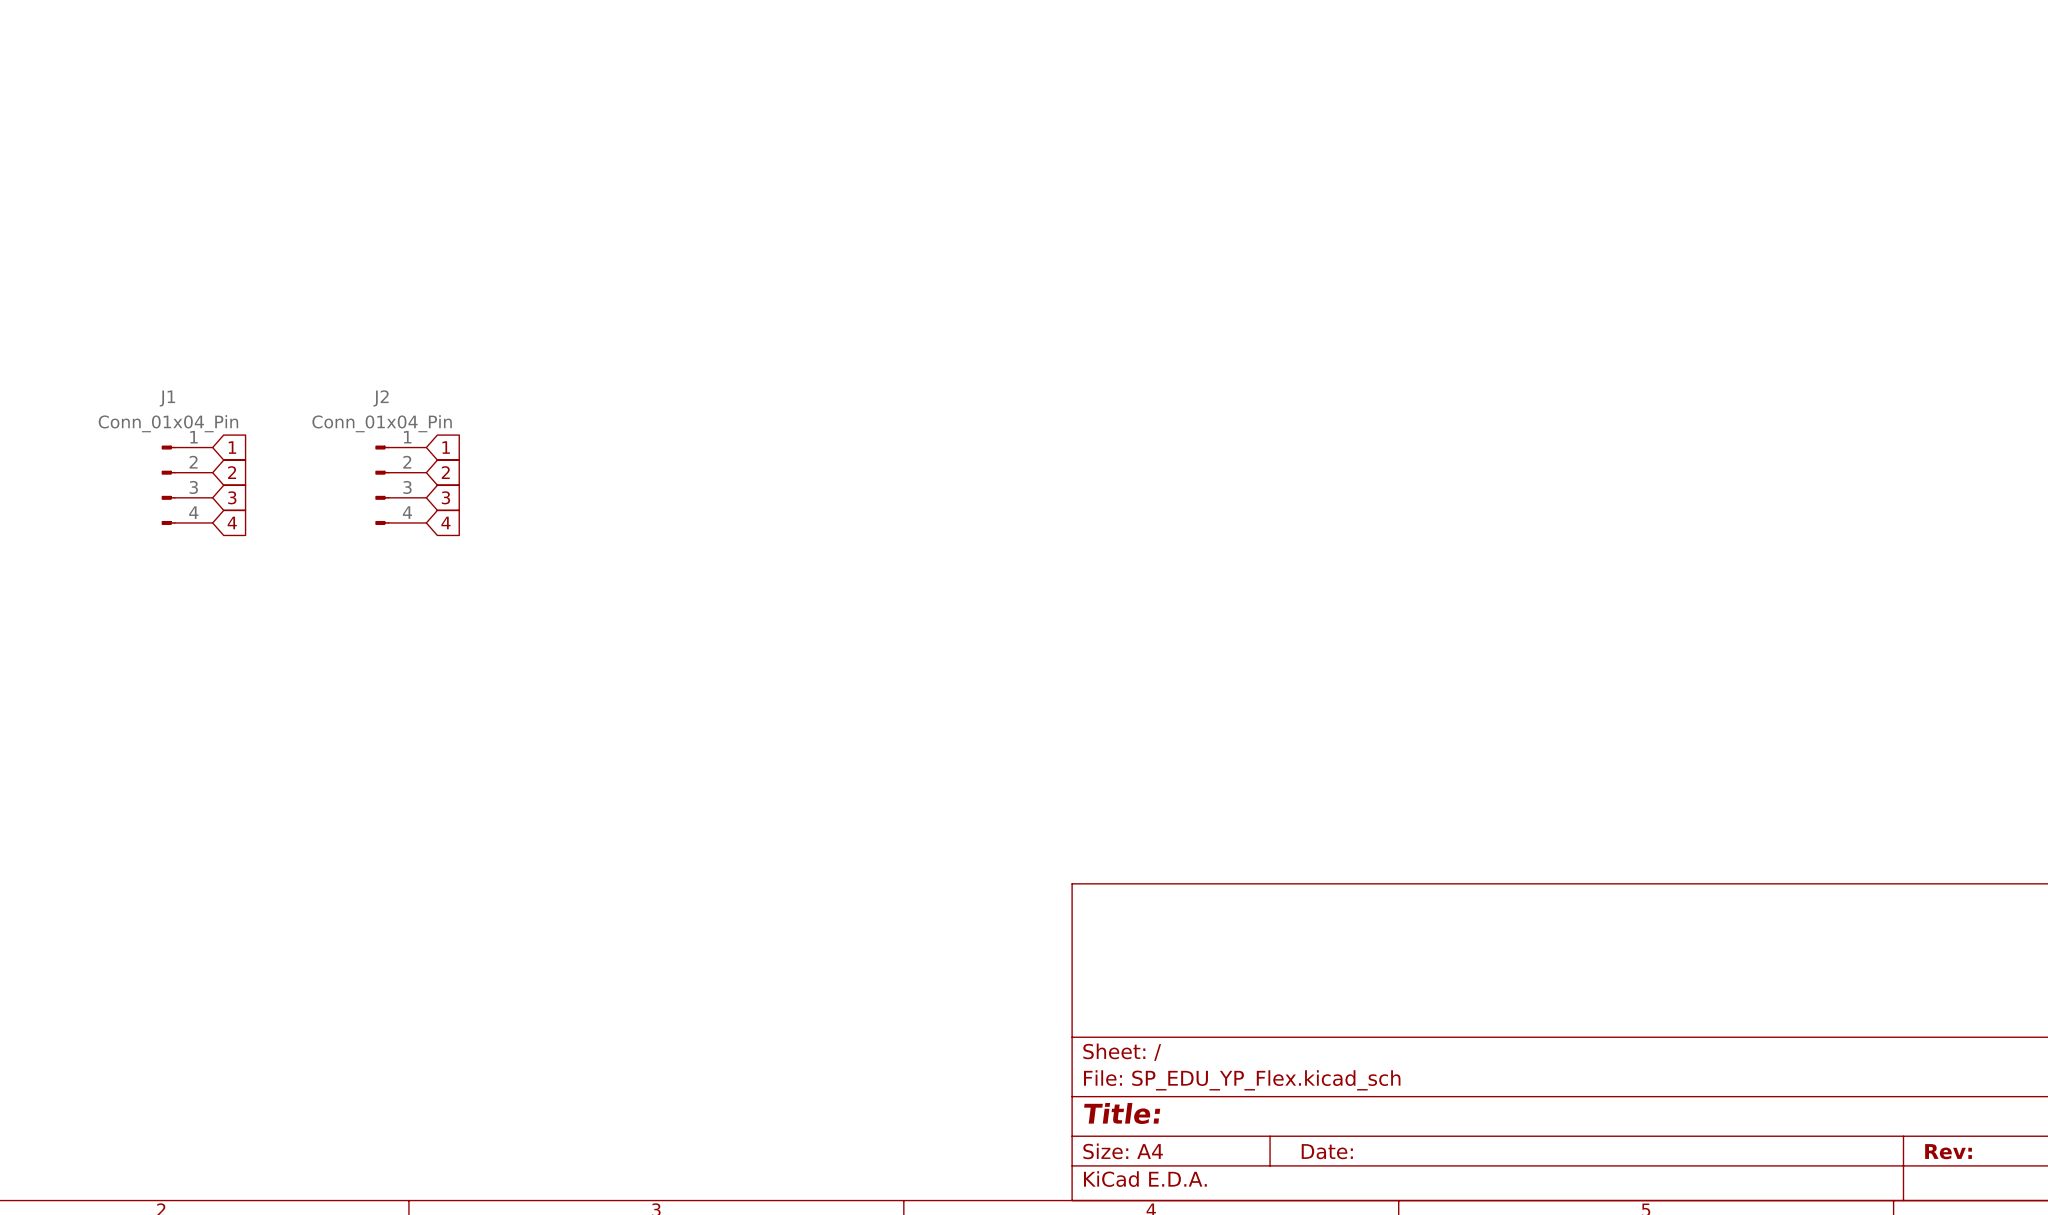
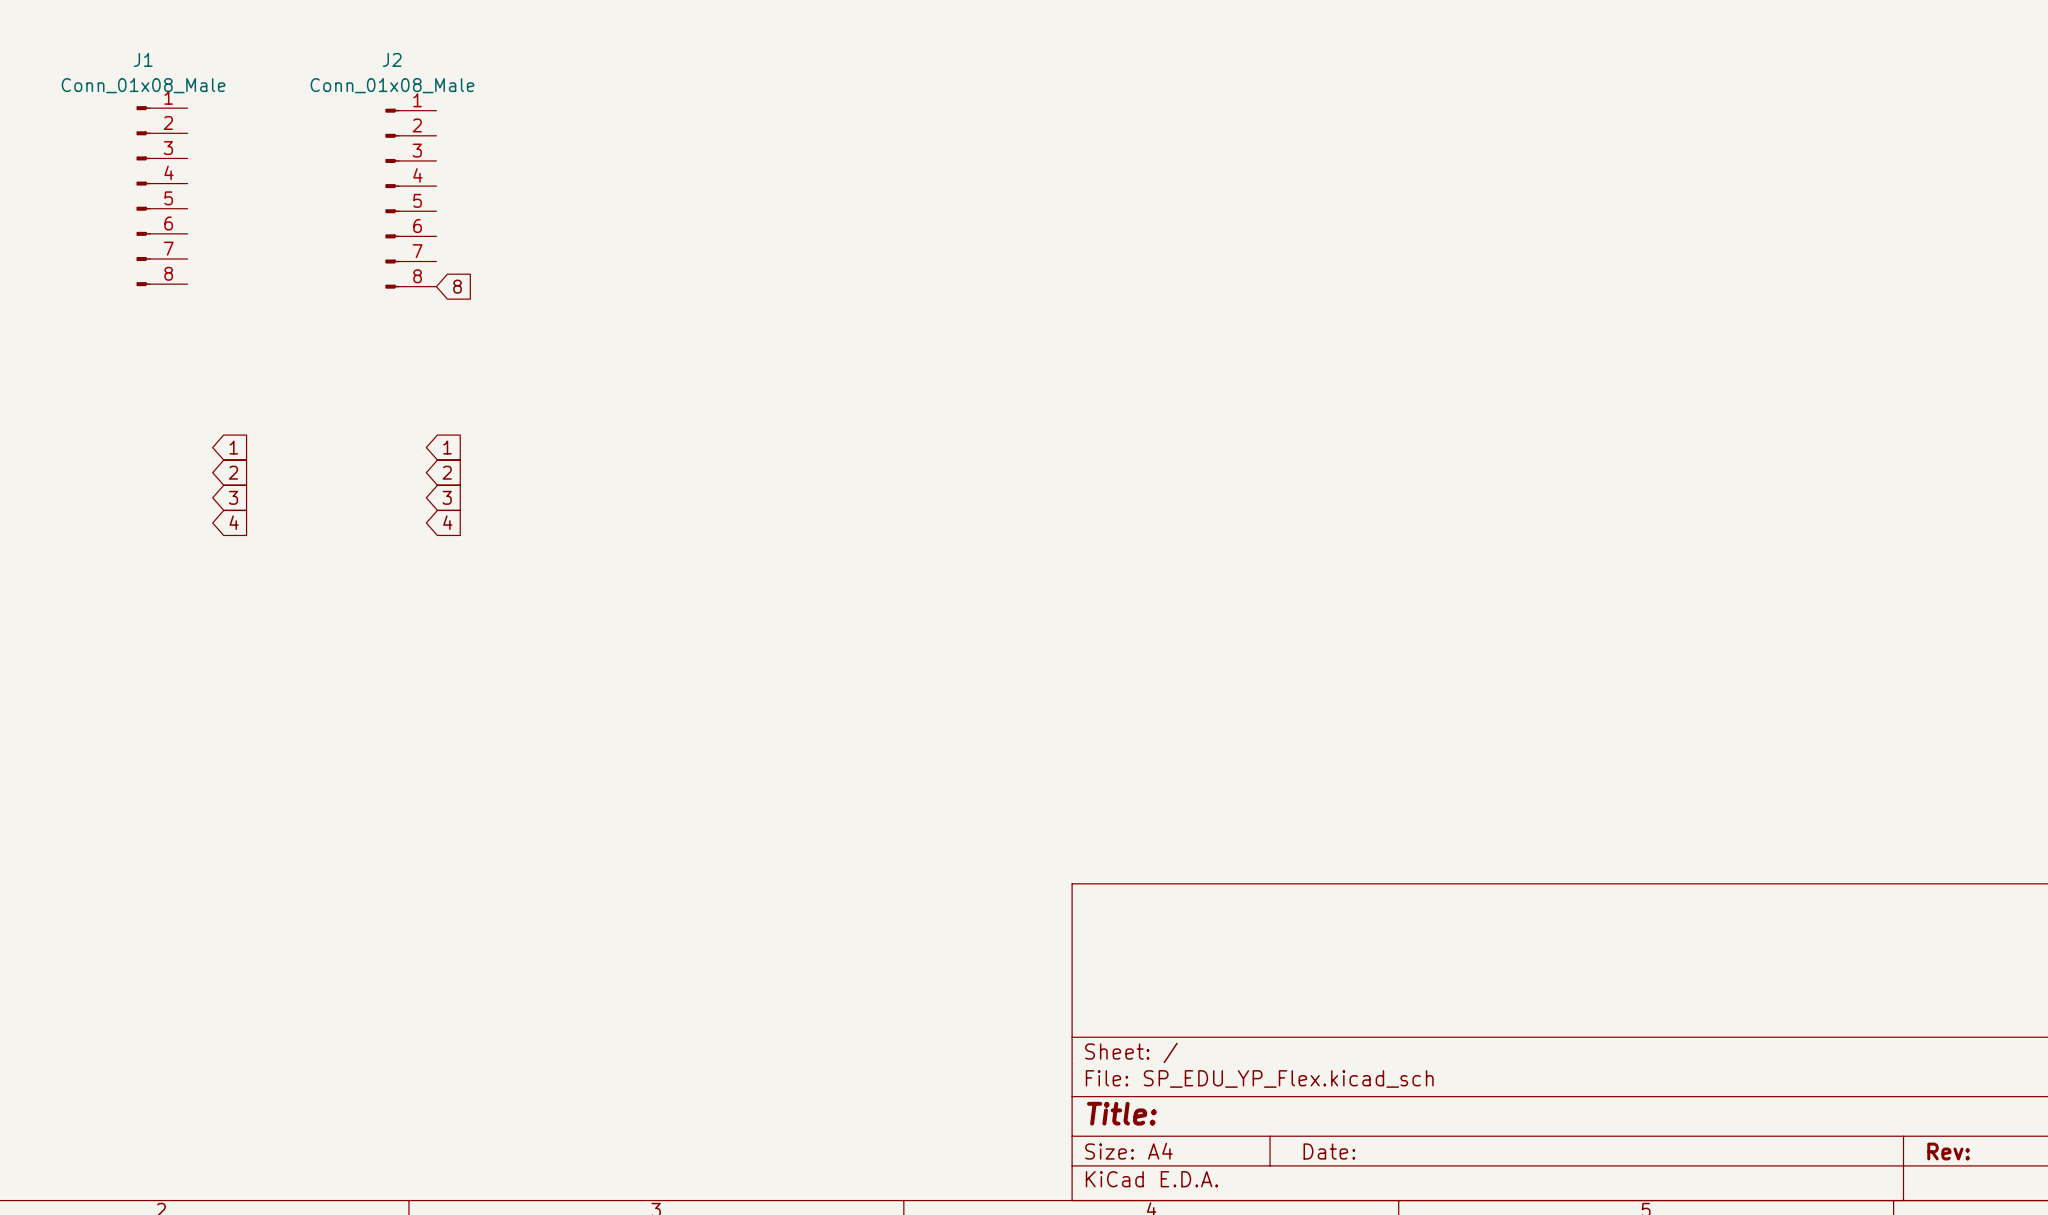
global label: none -> 8 (457, 286)
J1 name position: J1 (167, 398) -> J1 (143, 59)
J2 name position: J2 (381, 398) -> J2 (392, 59)
J1 value: Conn_01x04_Pin (168, 423) -> Conn_01x08_Male (143, 85)
J2 value: Conn_01x04_Pin (382, 423) -> Conn_01x08_Male (392, 85)
J1 symbol: [161, 445, 213, 525] -> [136, 106, 188, 287]
J2 symbol: [375, 445, 427, 525] -> [385, 108, 437, 289]

